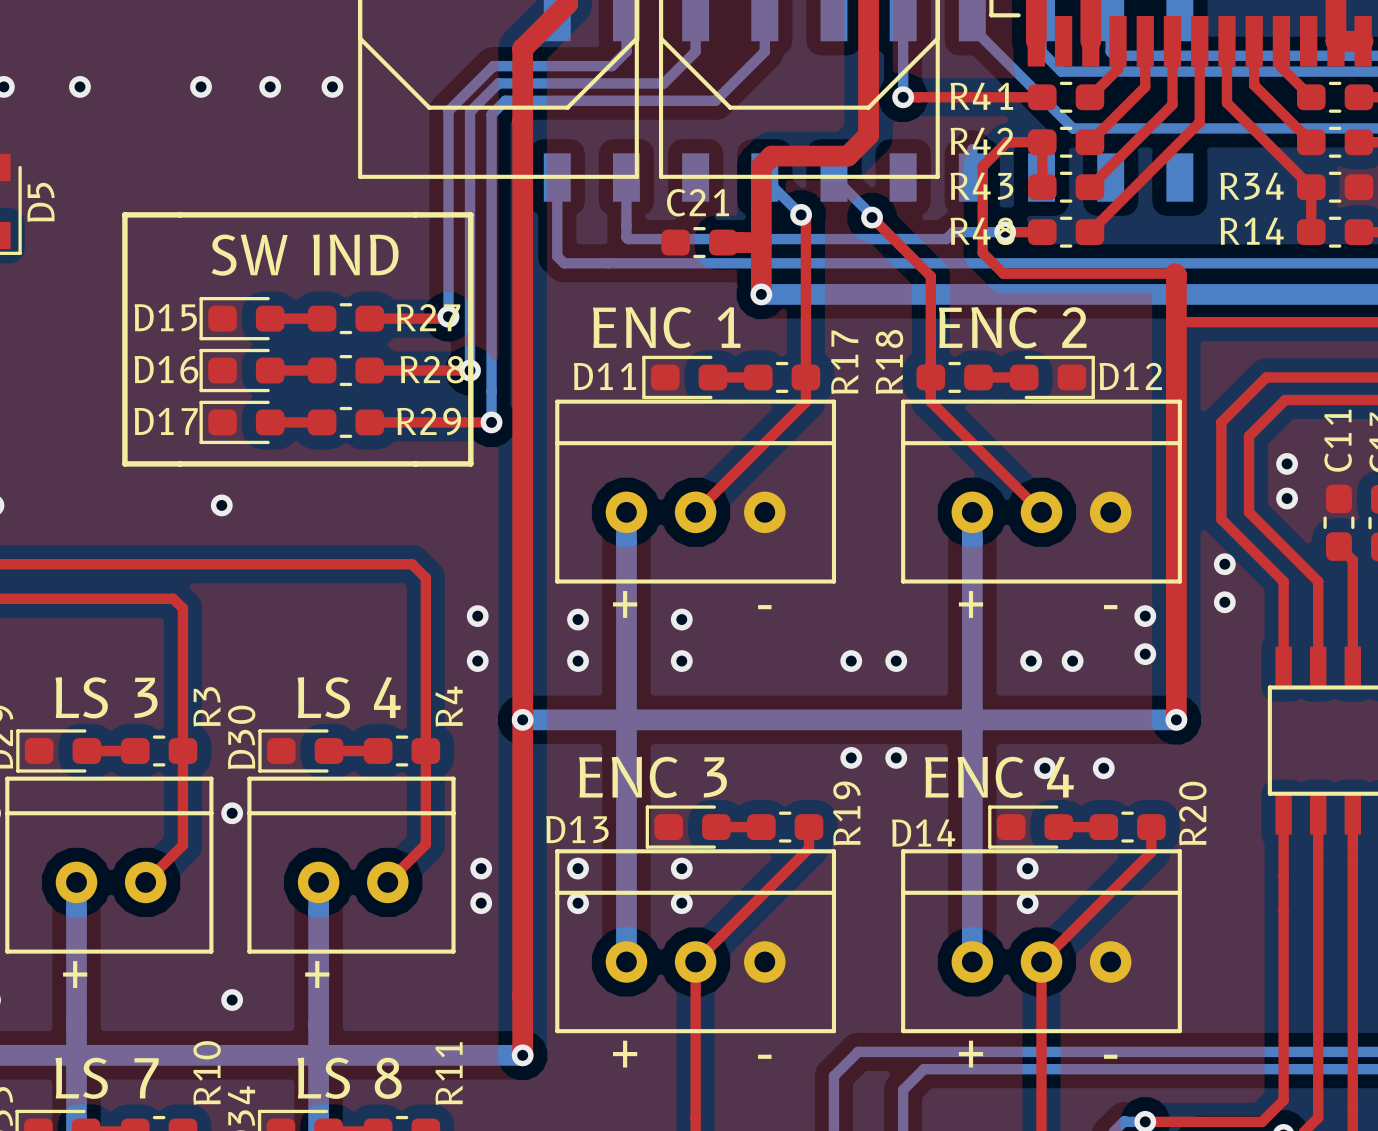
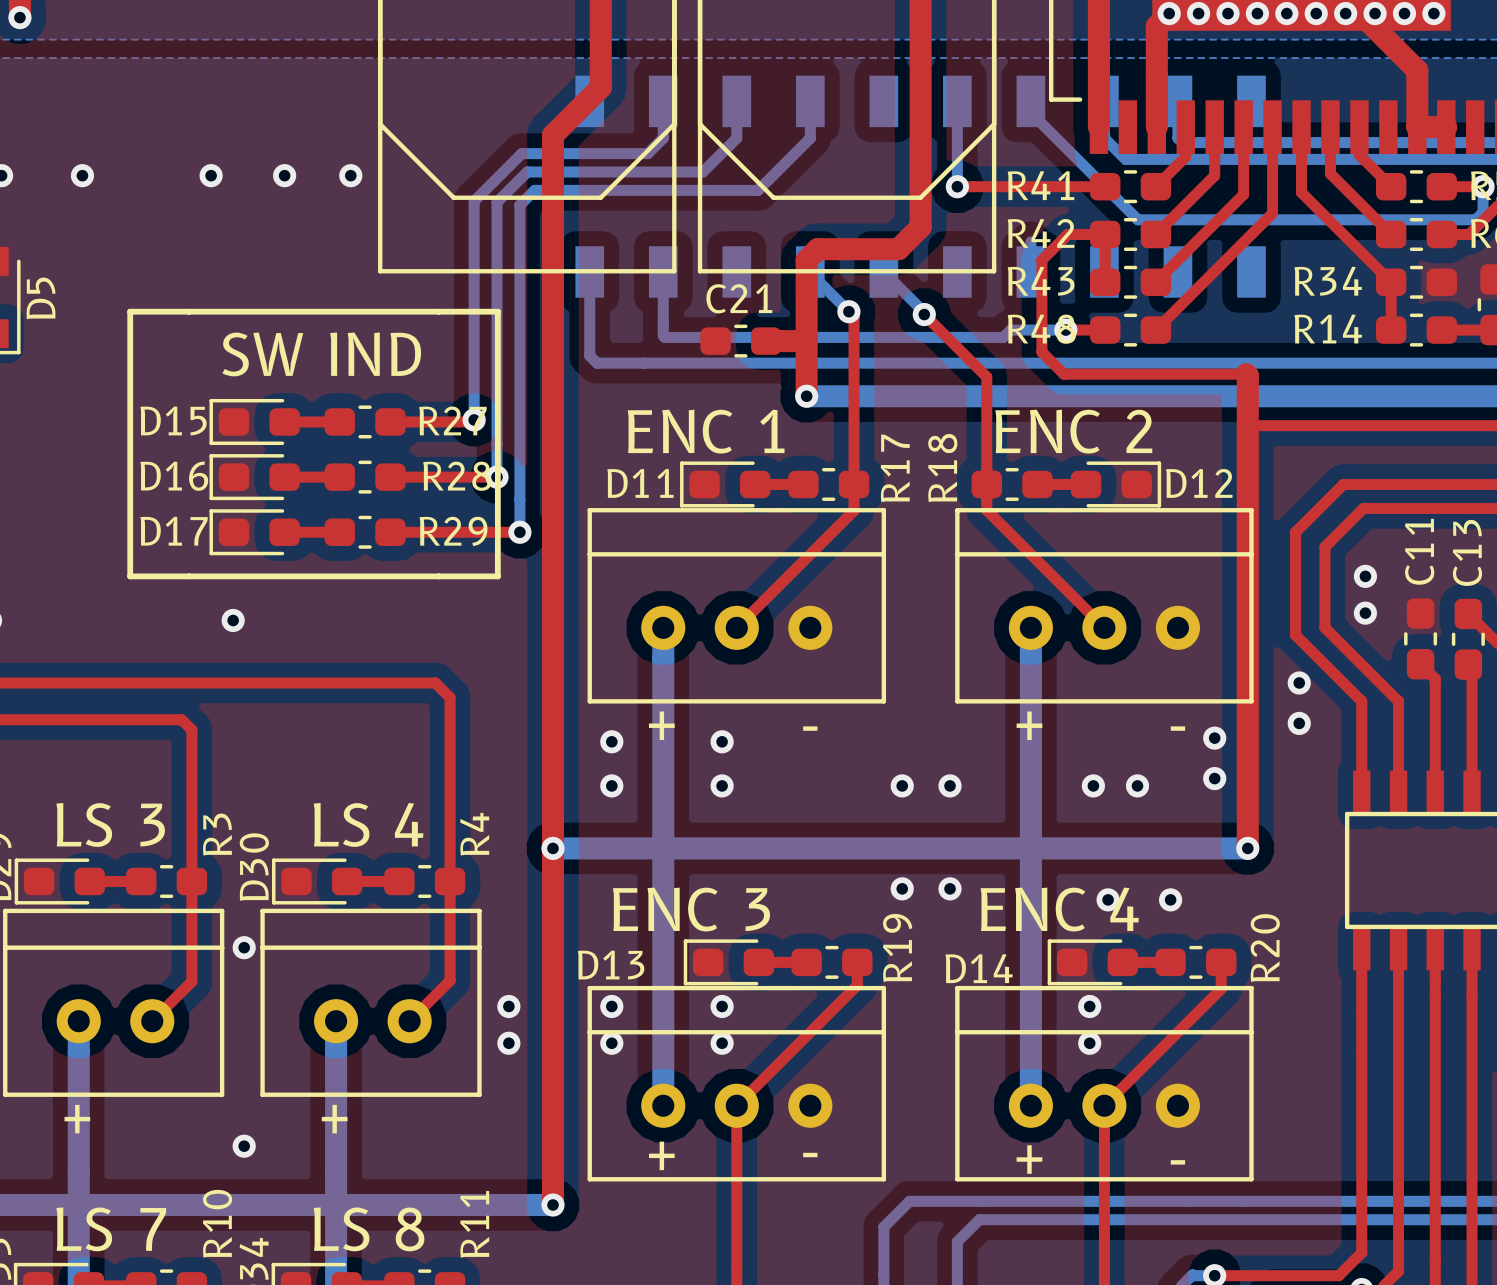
via: (477, 616) -> none
via: (477, 661) -> none
text position: + (625, 1054) -> + (661, 1155)
text position: + (970, 1054) -> + (1029, 1159)
text position: - (764, 1056) -> - (810, 1155)
text position: - (1110, 1056) -> - (1177, 1162)

